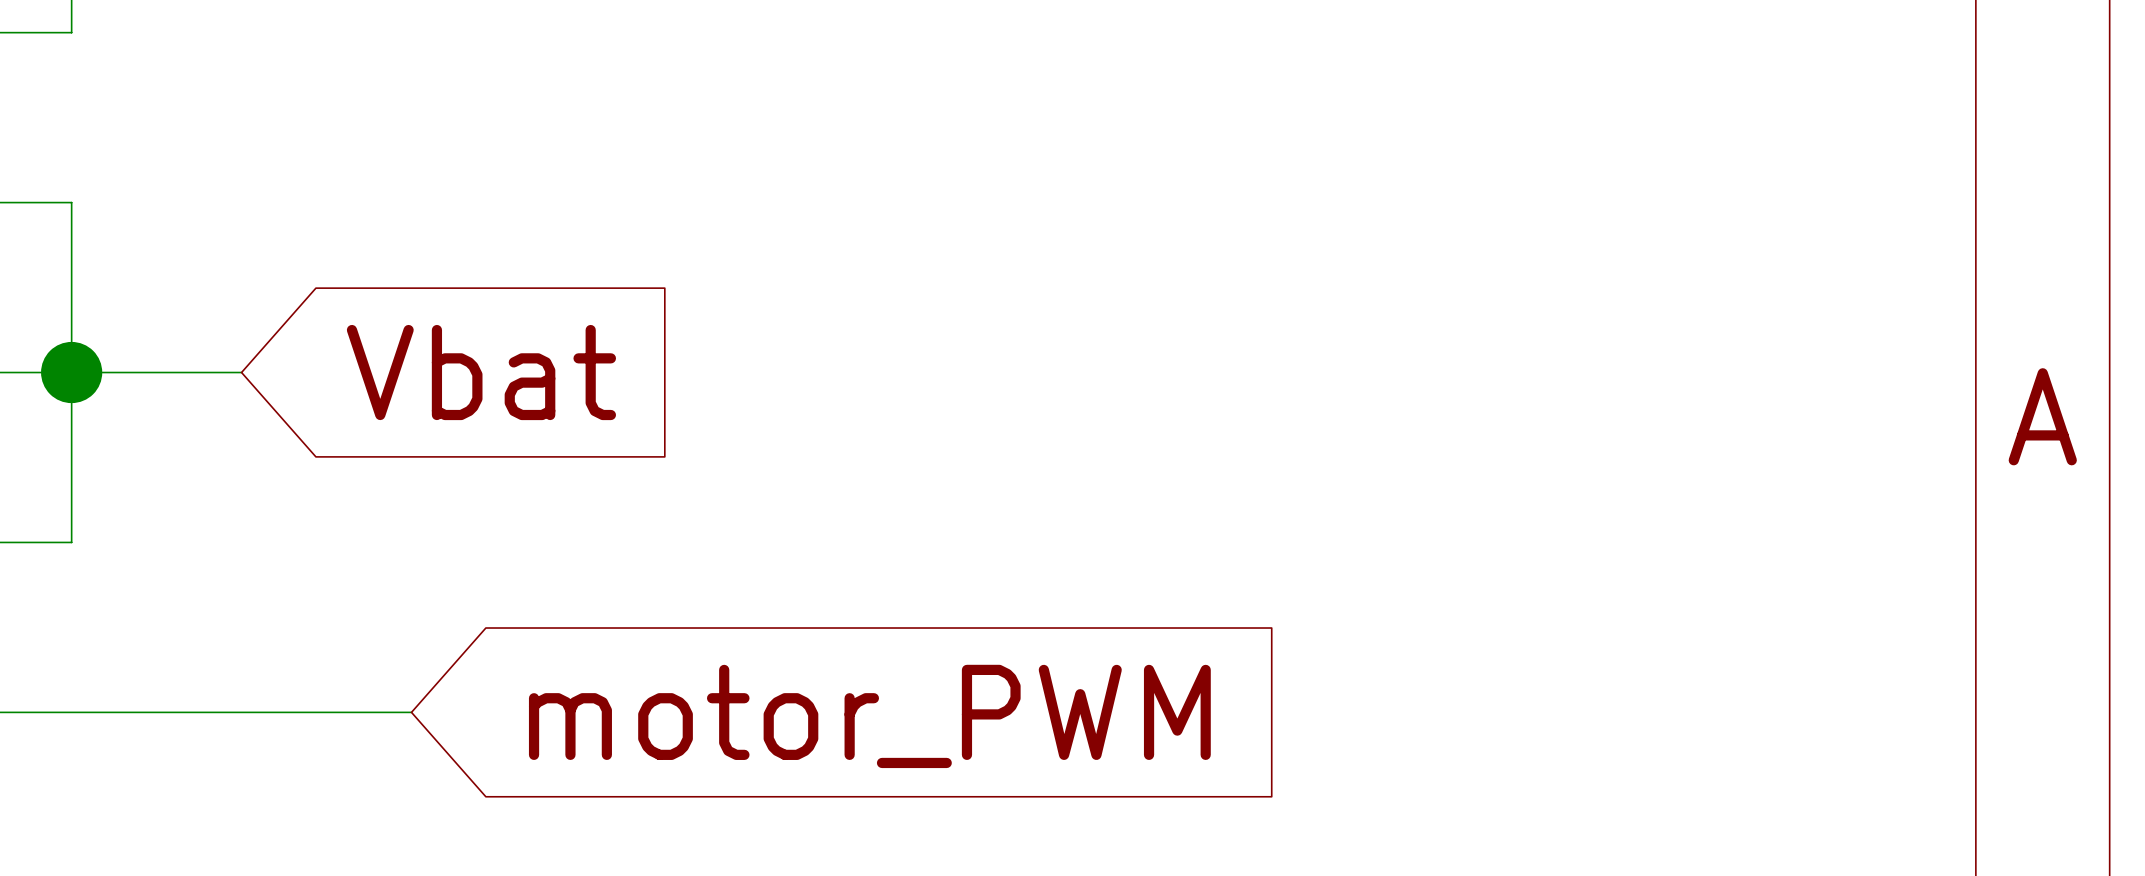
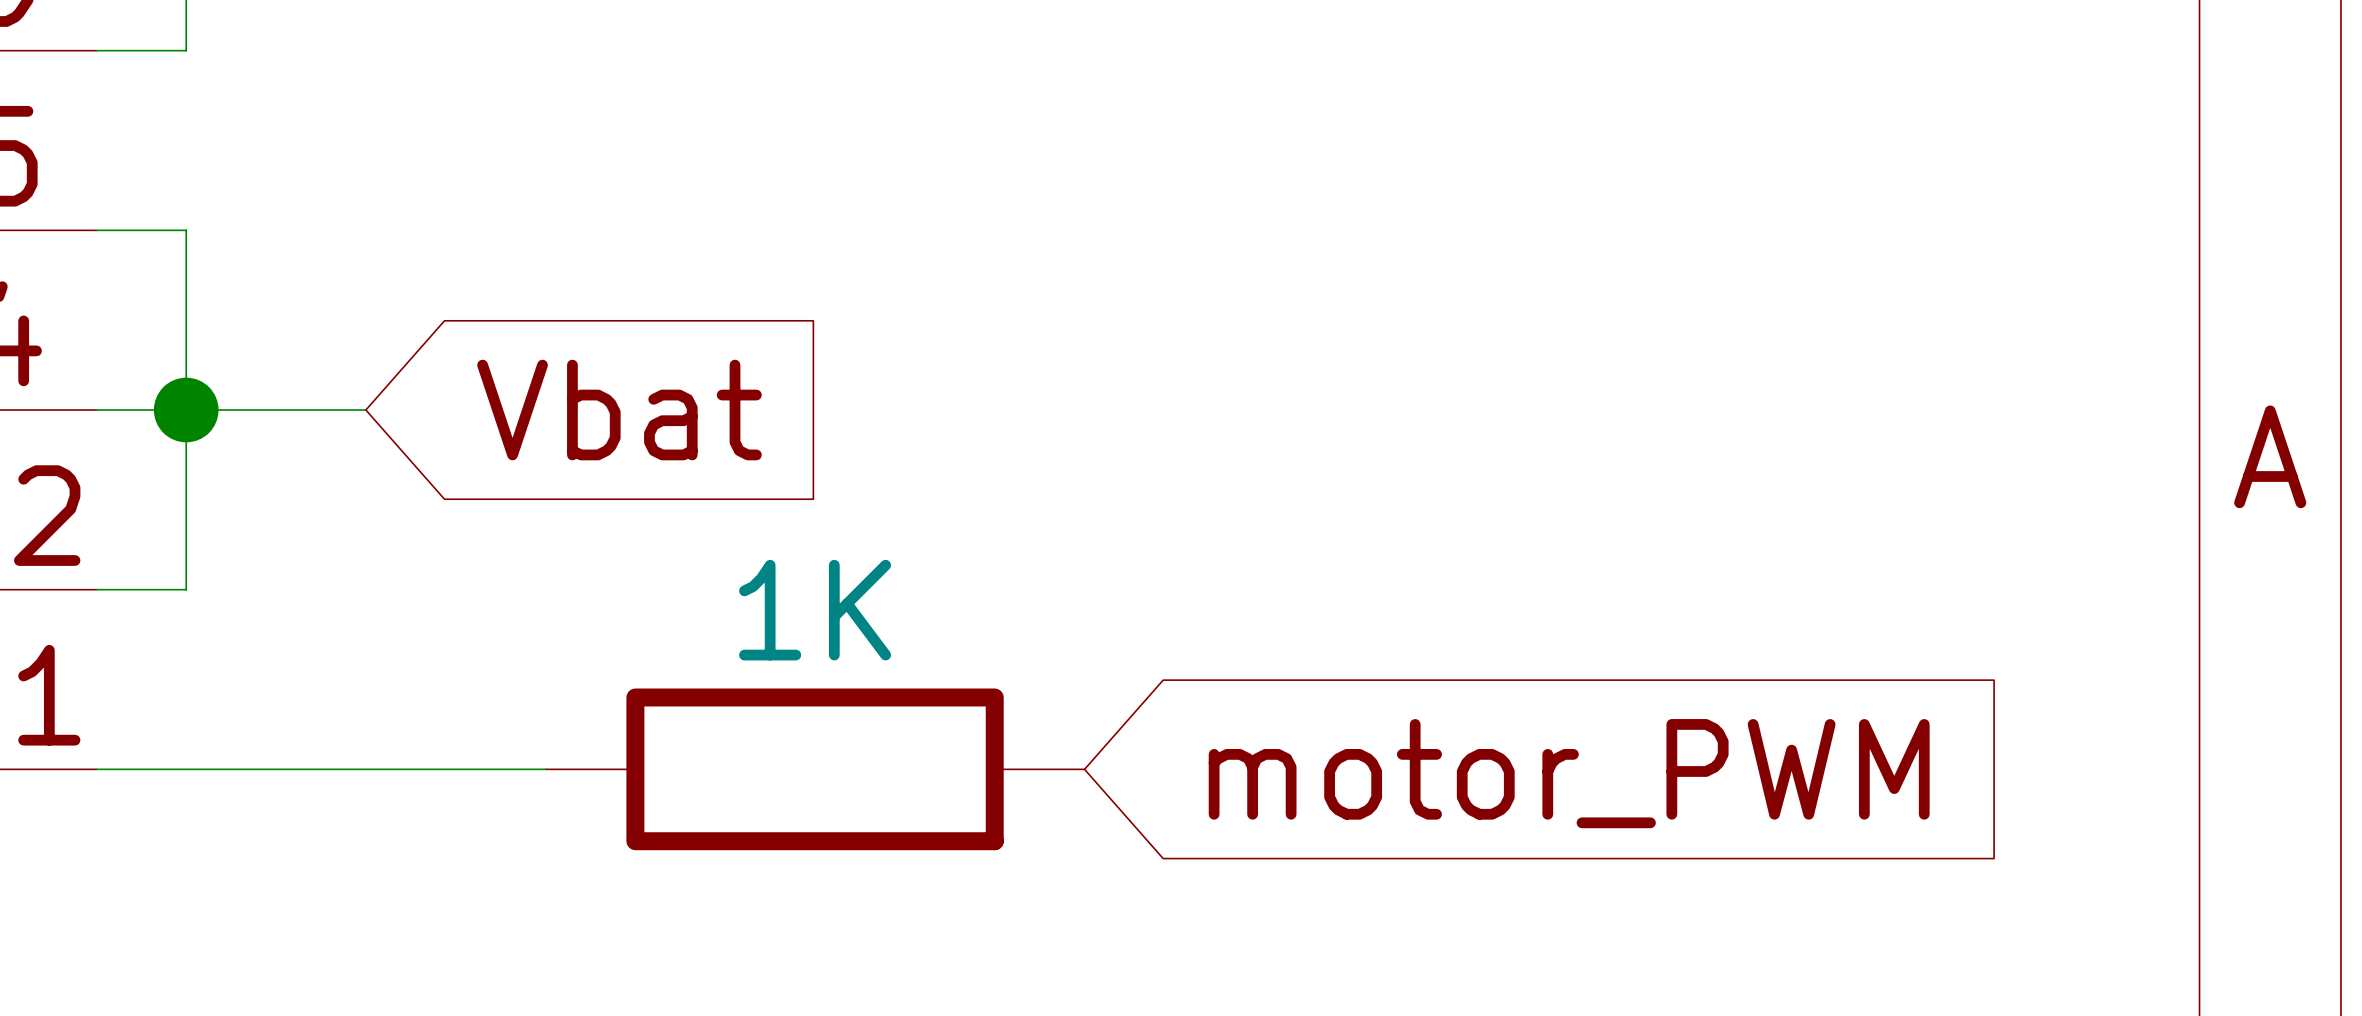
part: none -> 1K (815, 769)
global label position: motor_PWM (869, 716) -> motor_PWM (1569, 773)

